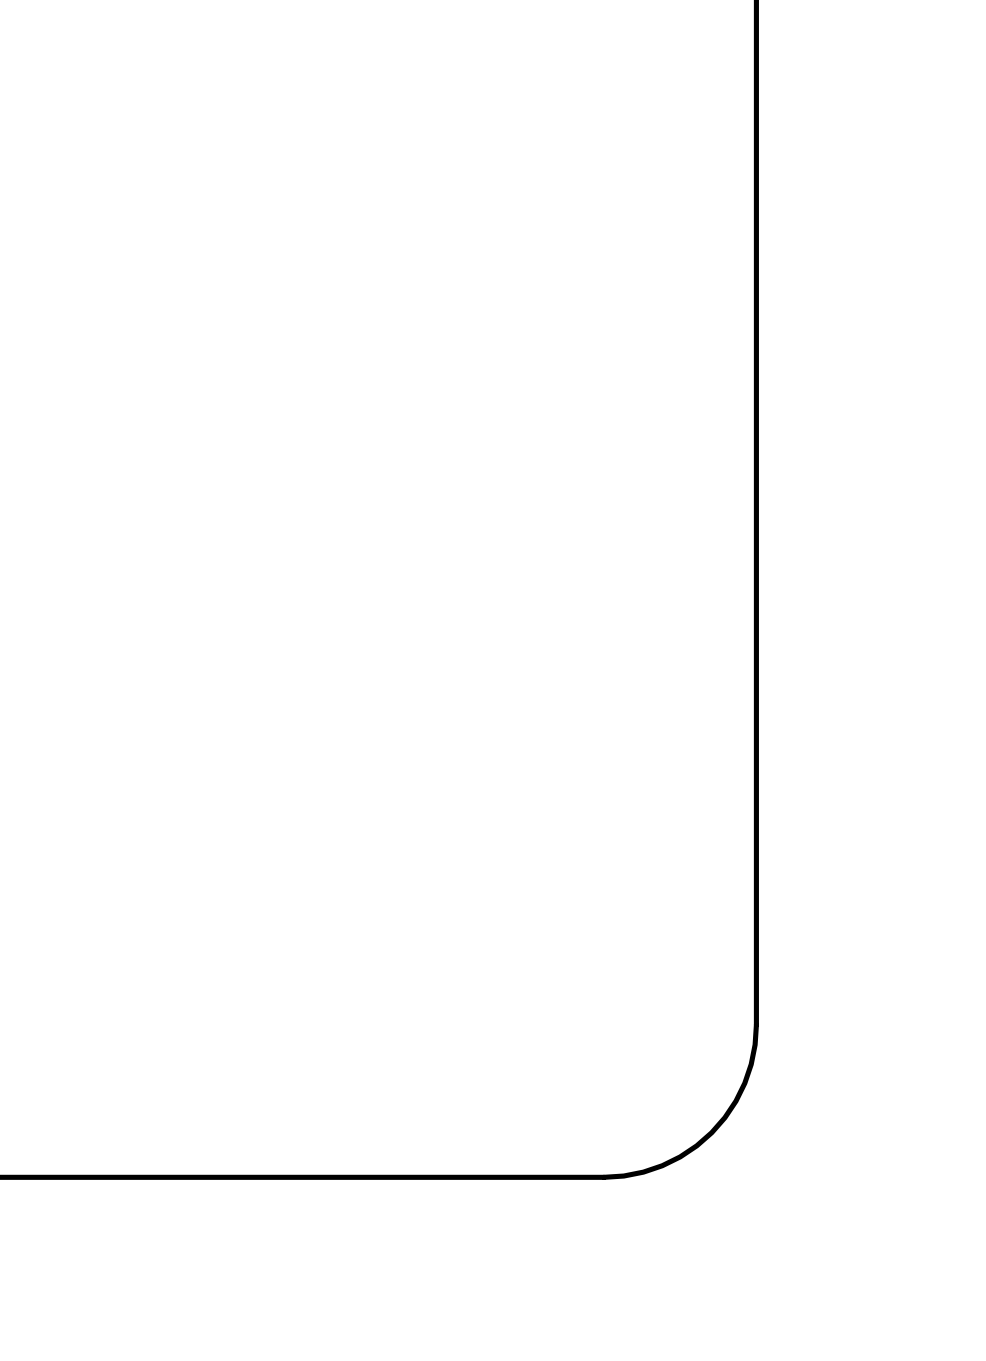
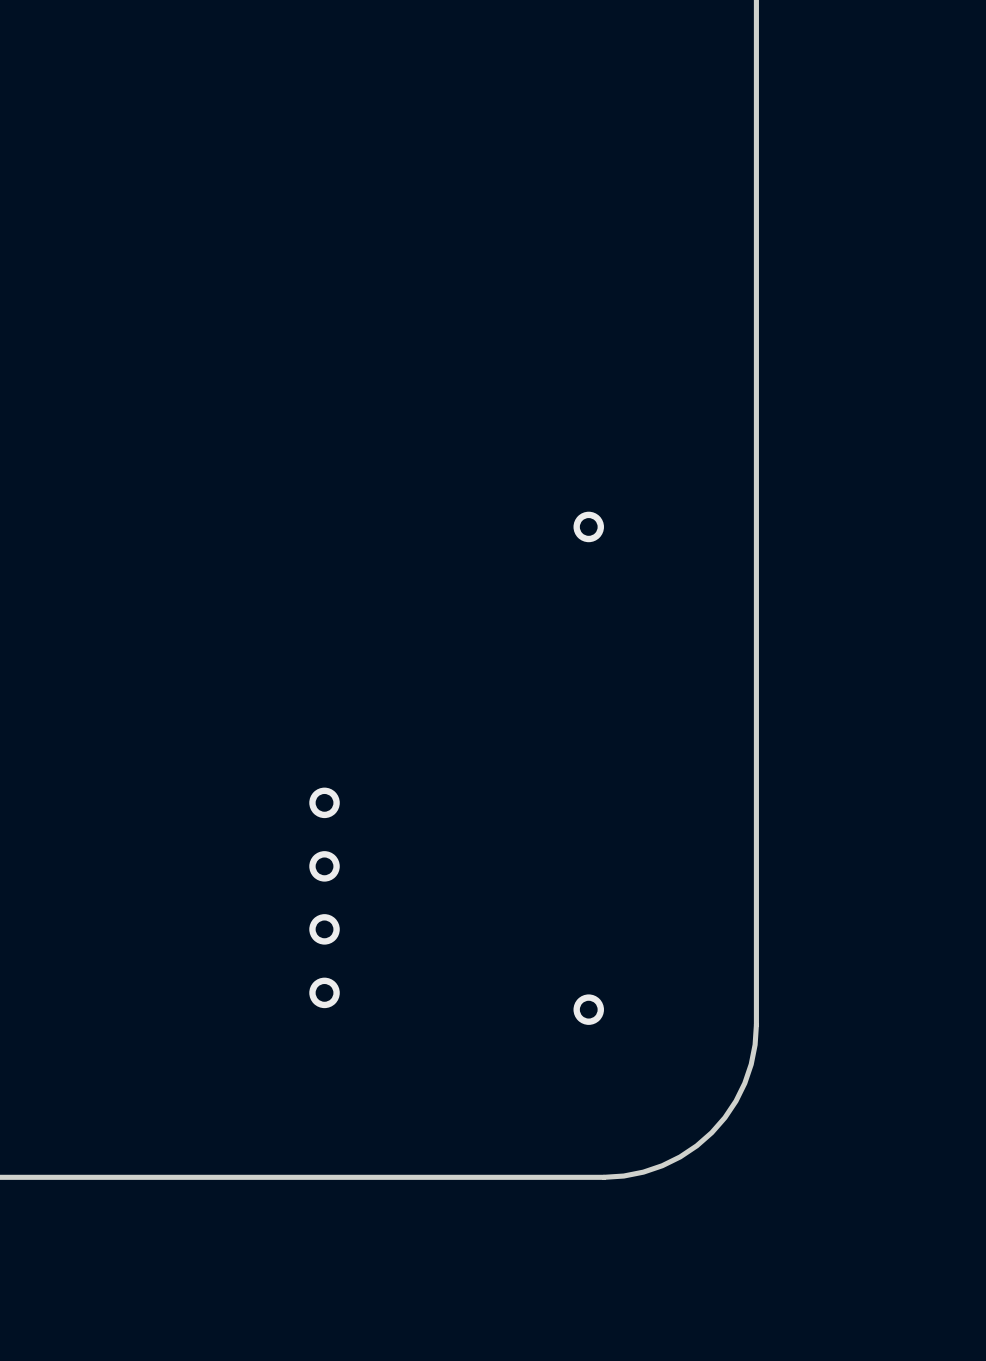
via: none -> (588, 526)
via: none -> (324, 802)
via: none -> (324, 866)
via: none -> (324, 929)
via: none -> (324, 992)
via: none -> (588, 1009)

